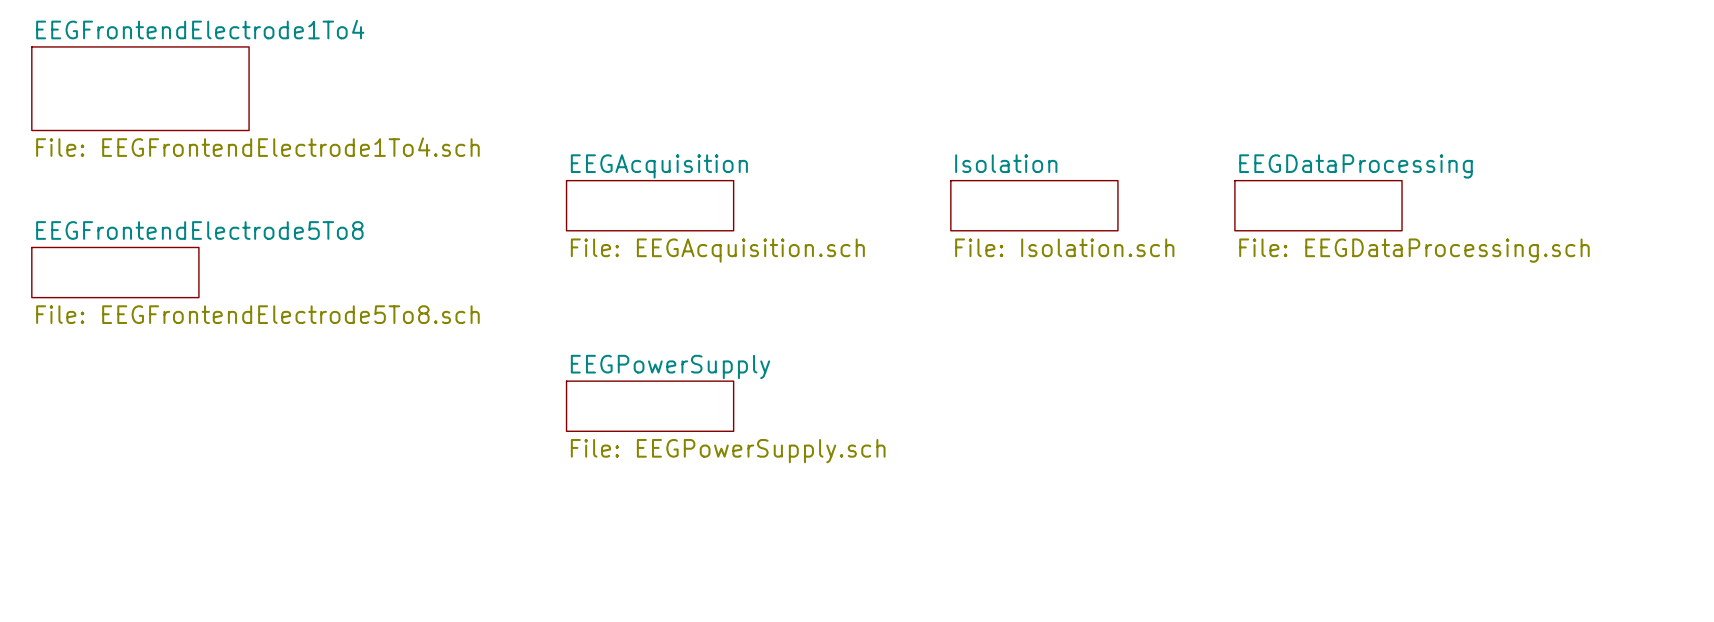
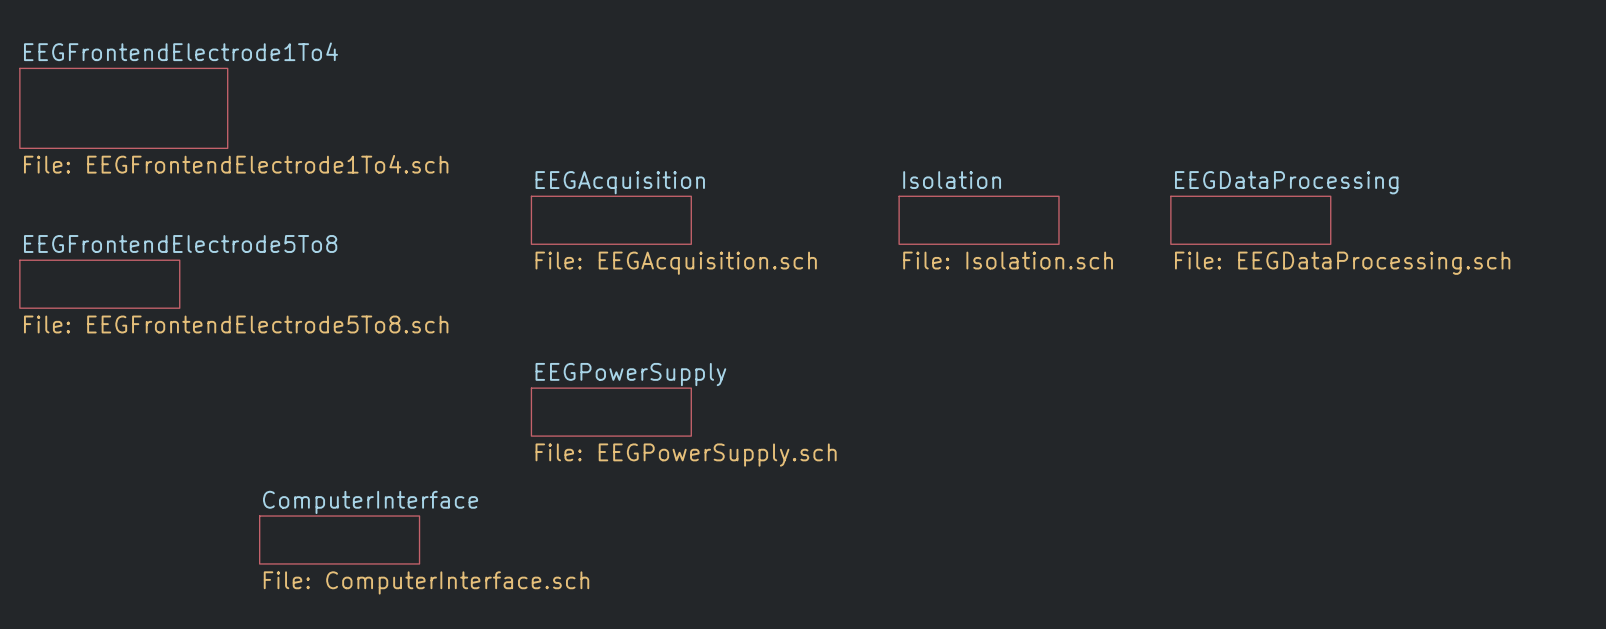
sheet ComputerInterface: none -> File: ComputerInterface.sch (339, 539)

